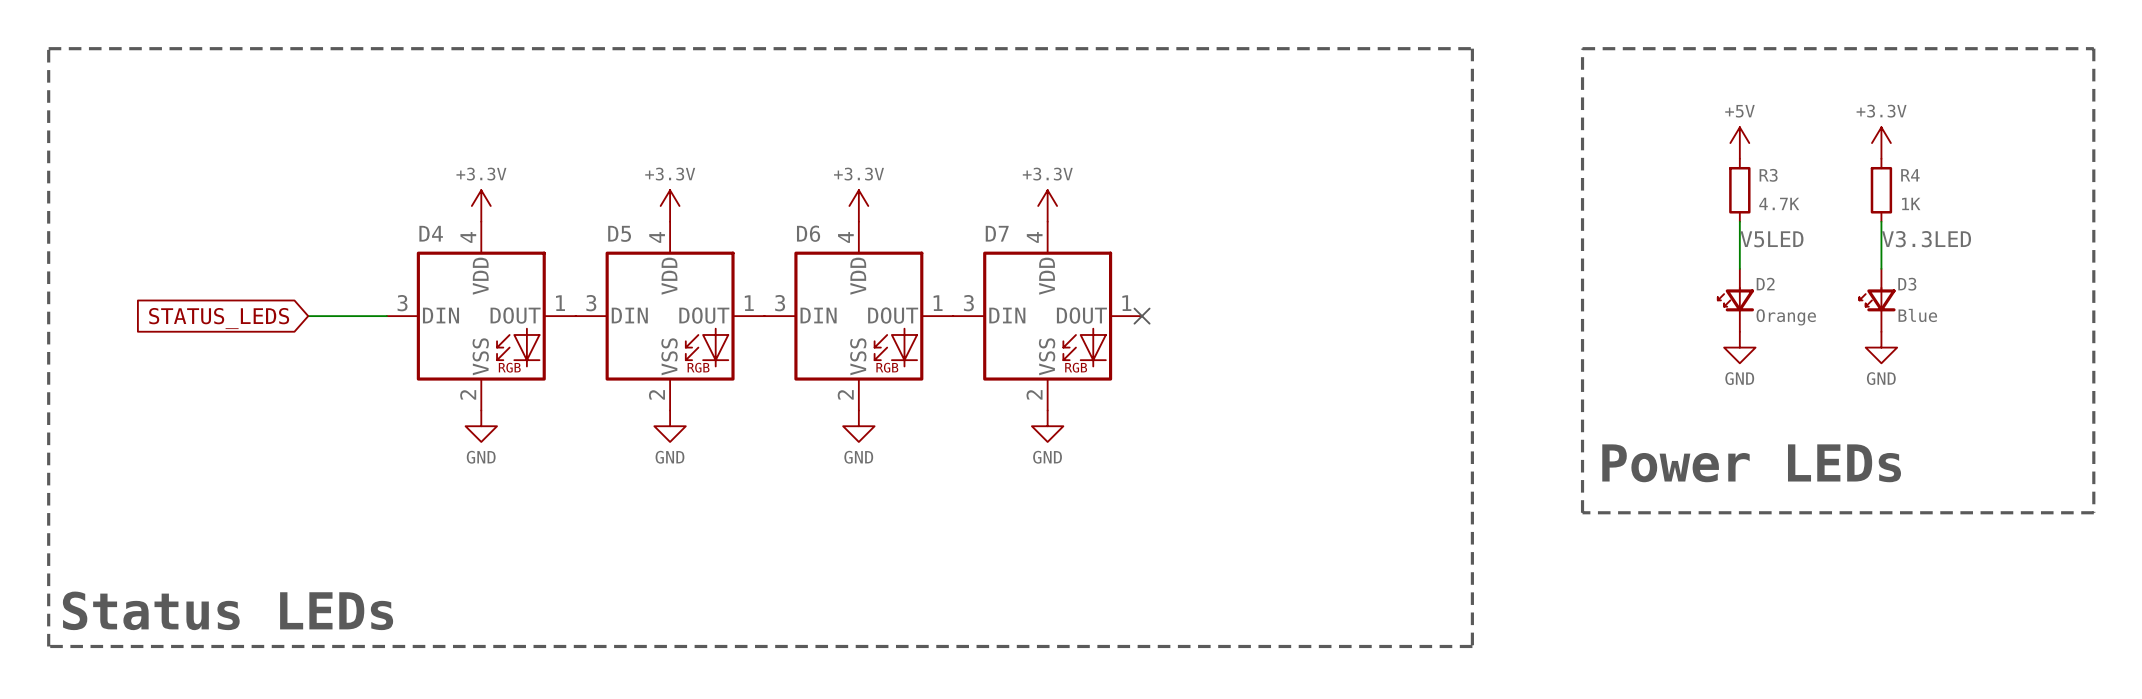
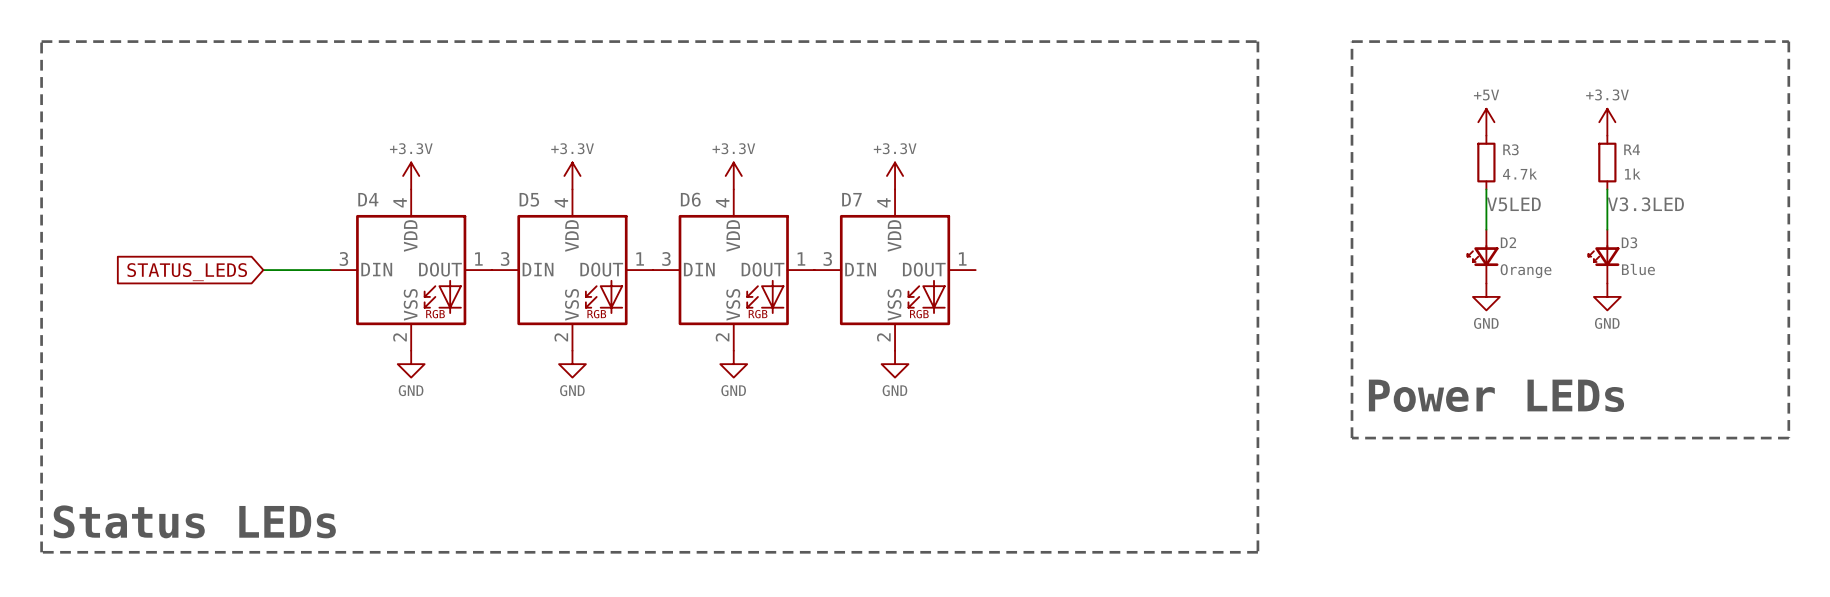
R3 value: 4.7K (1779, 203) -> 4.7k (1519, 174)
R4 value: 1K (1911, 203) -> 1k (1632, 174)
no-connect mark: (1142, 316) -> none

